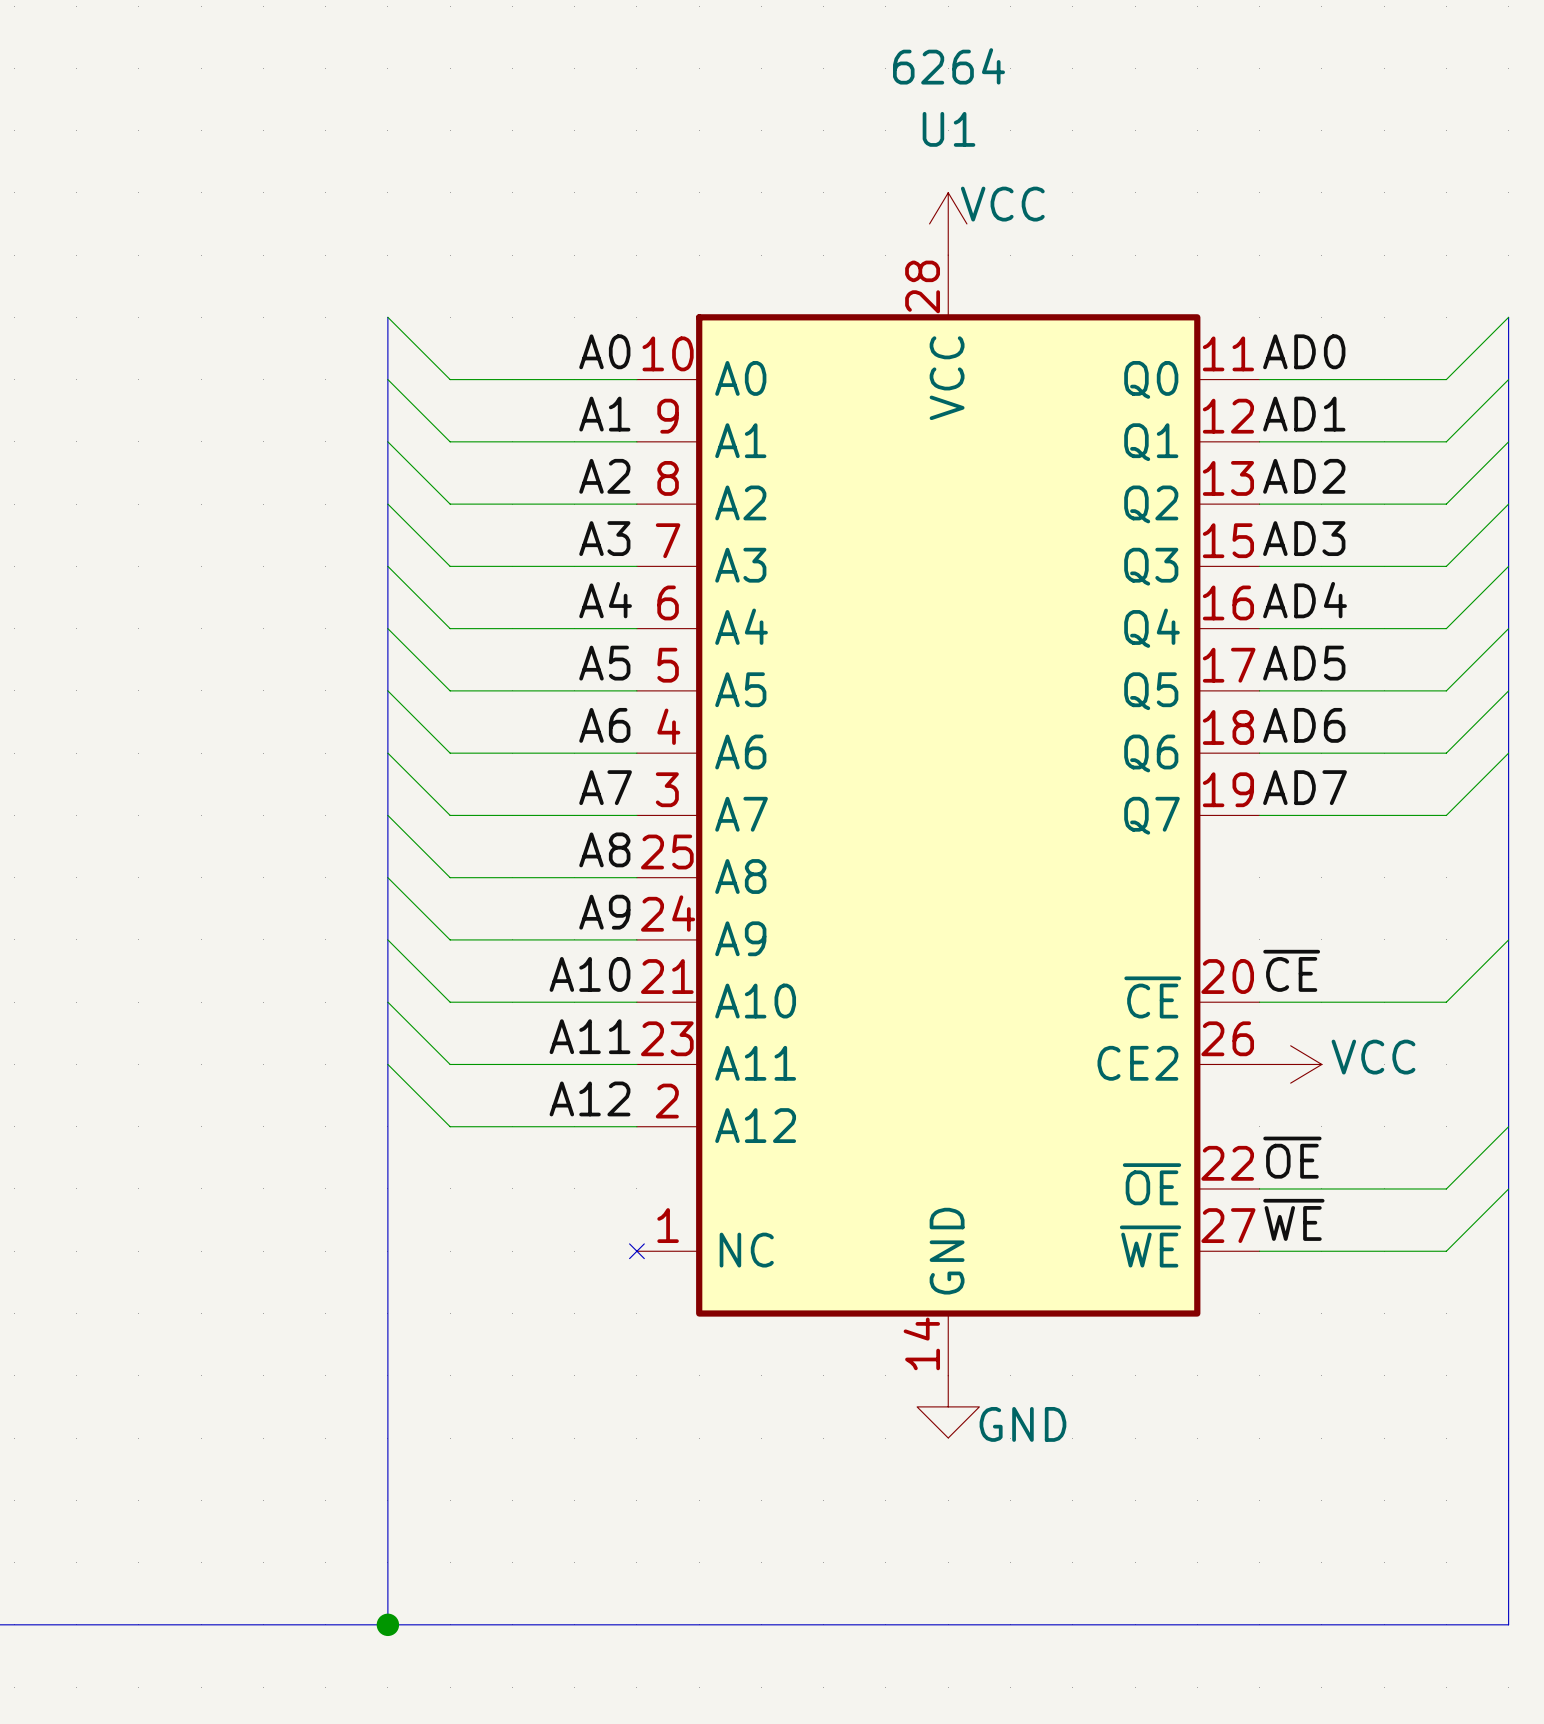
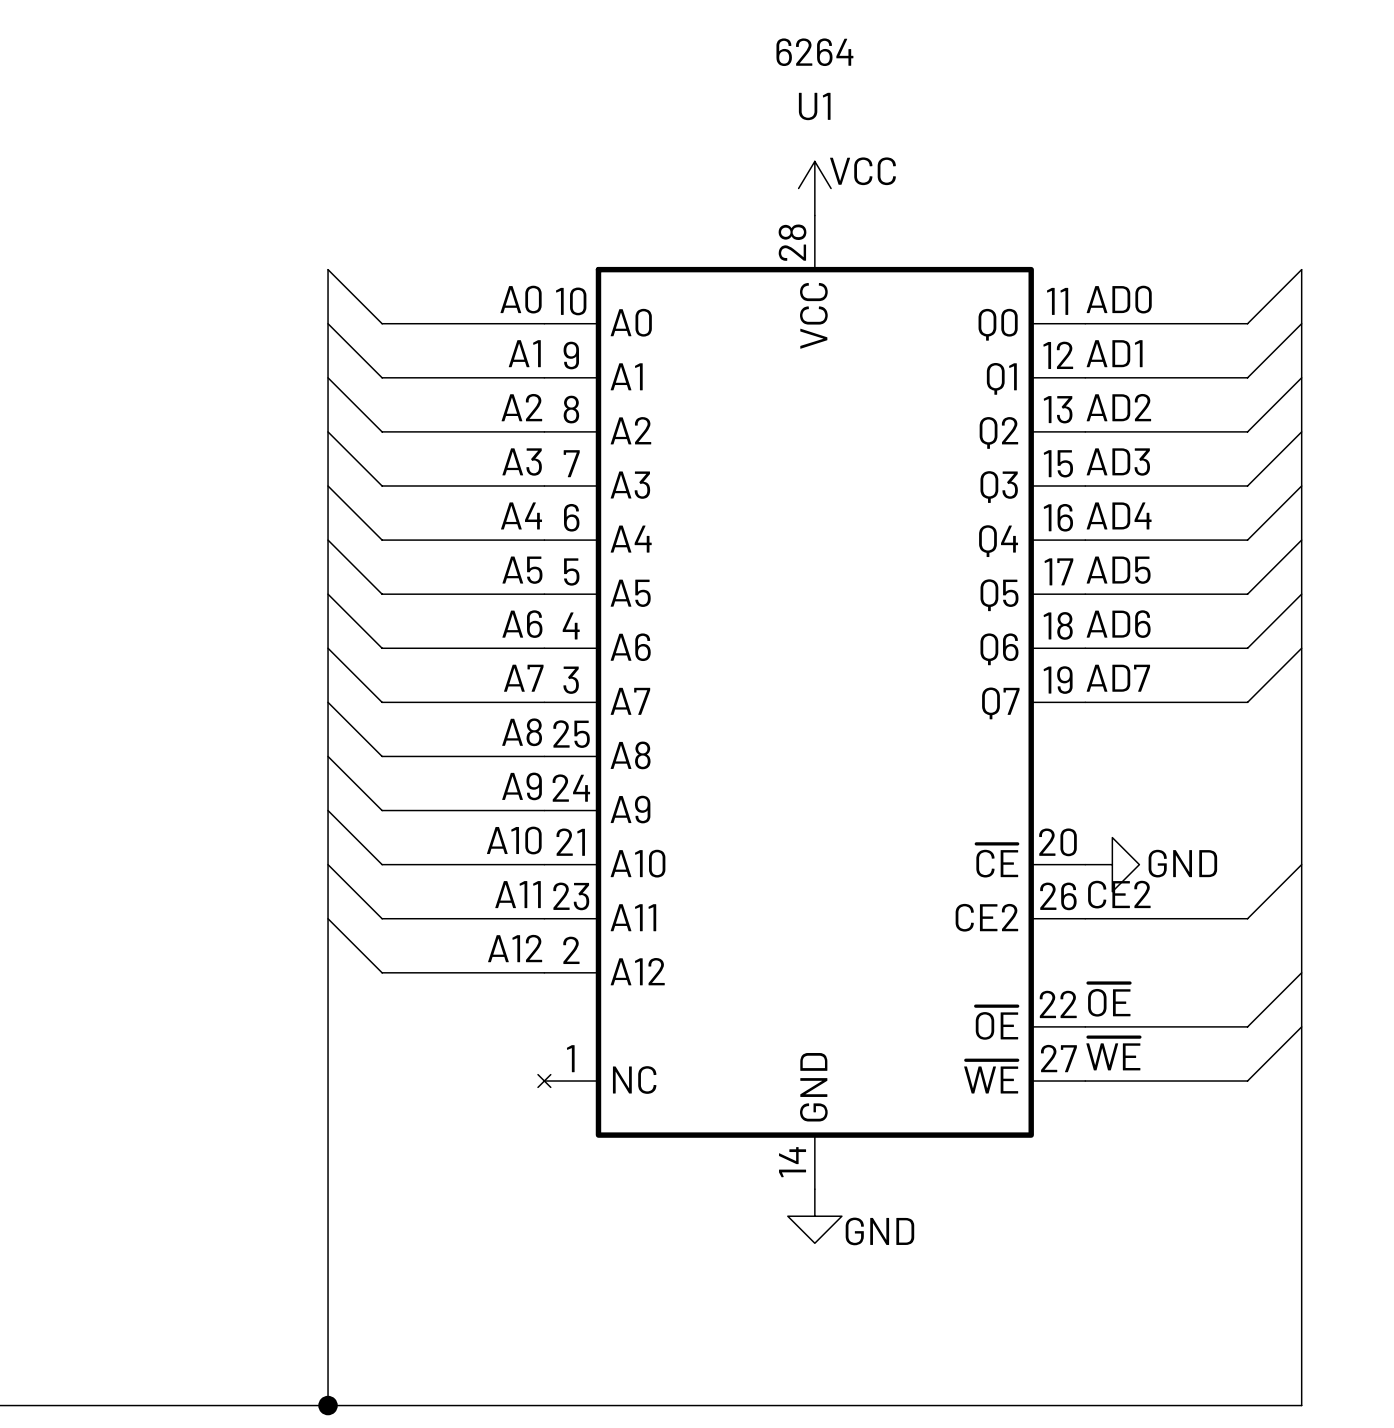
wire: (1508, 939) (1446, 1002) (1259, 1002) -> (1301, 864) (1247, 918) (1085, 918)
label: ~{CE} (1291, 970) -> none
power symbol: none -> GND (1112, 864)
label: none -> CE2 (1119, 894)
power symbol: VCC (1290, 1064) -> none

